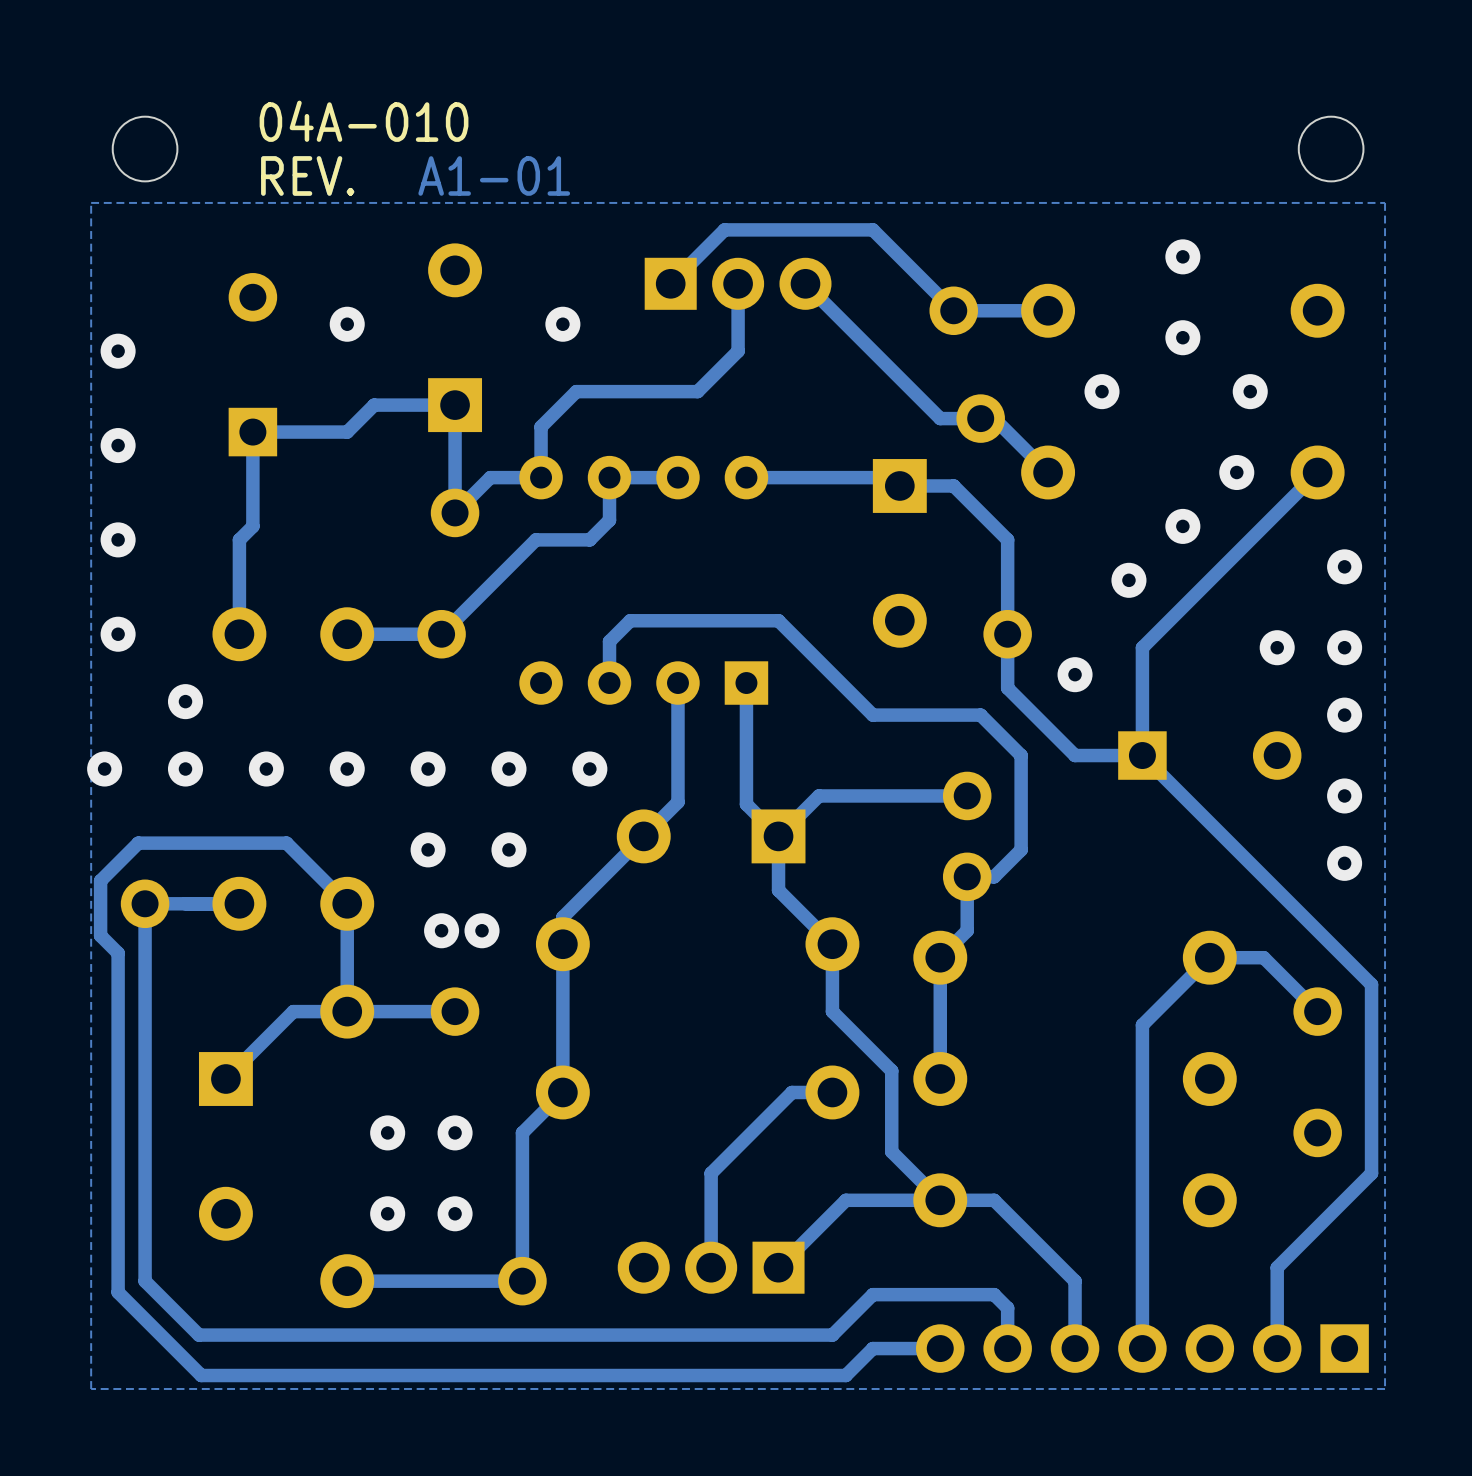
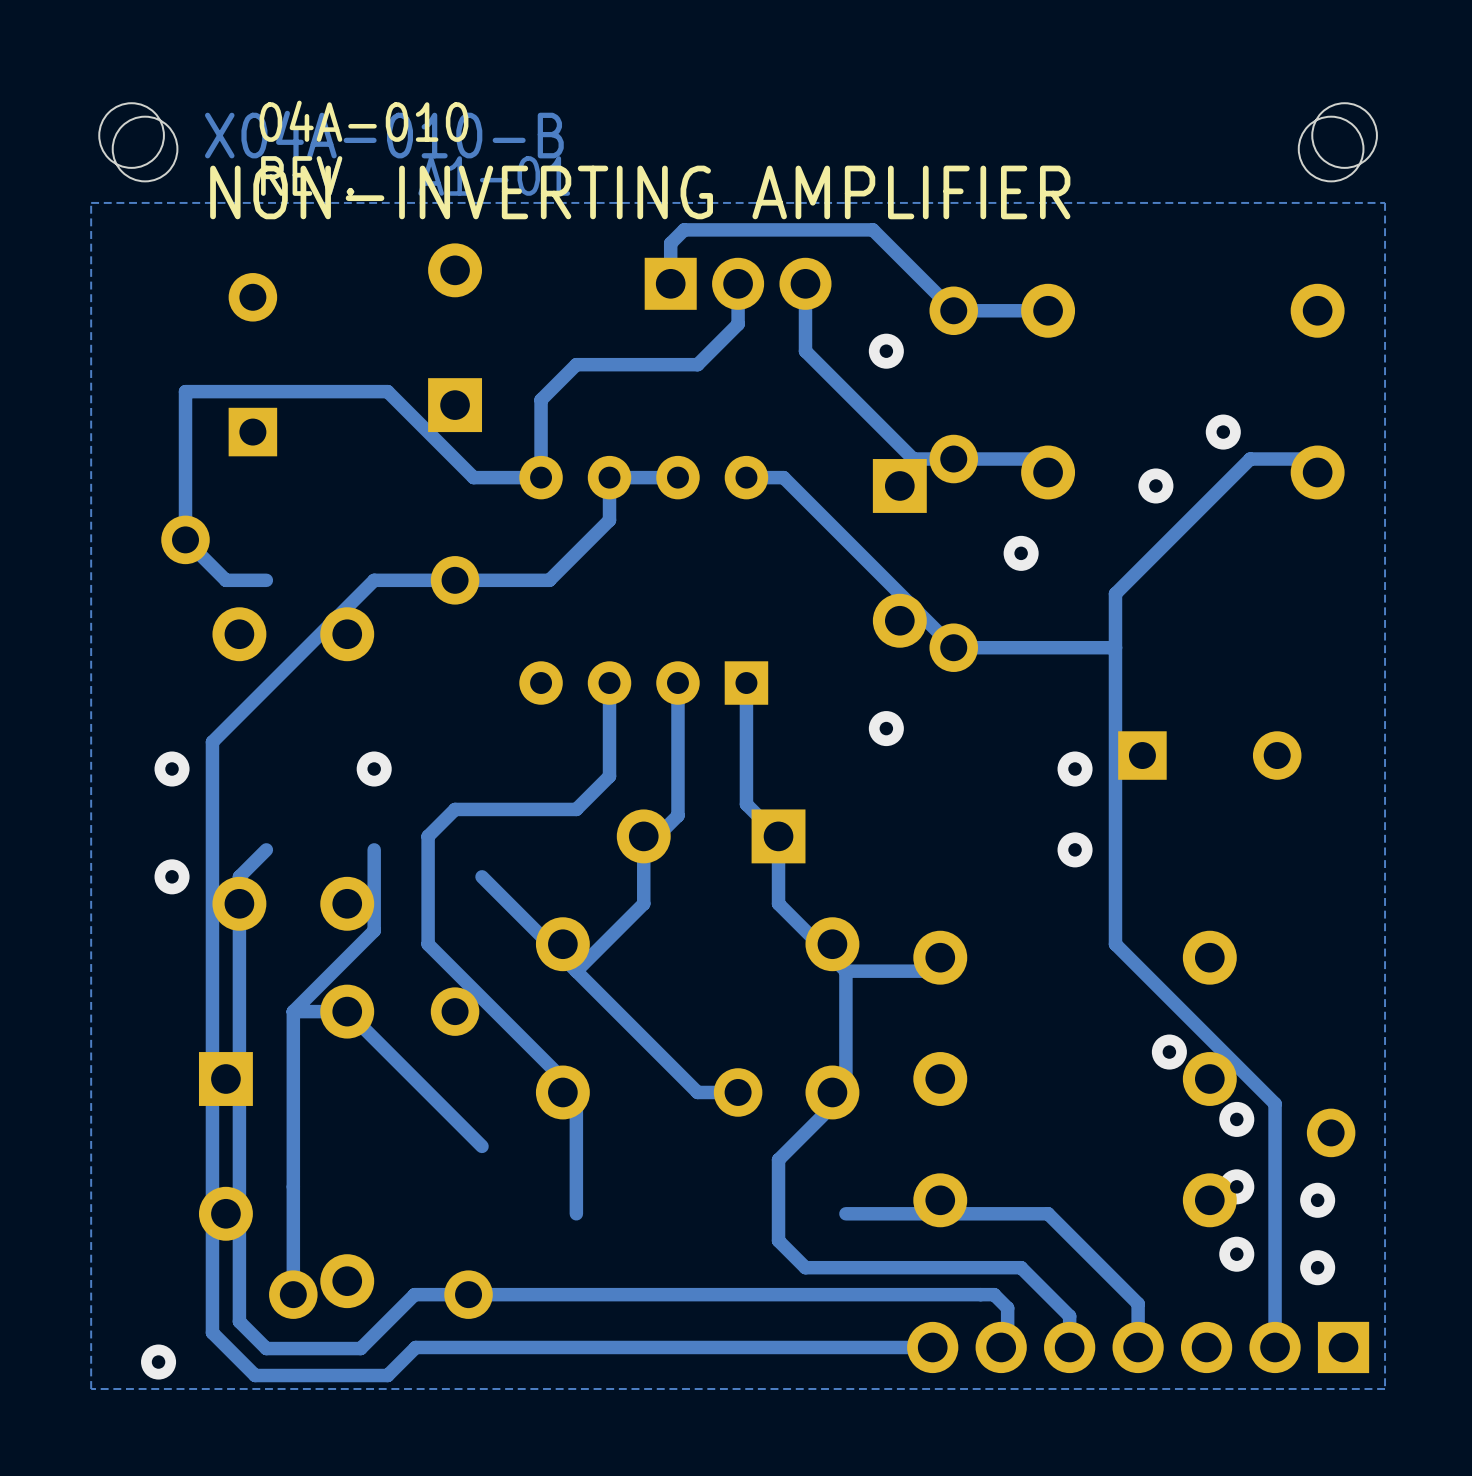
text: none -> NON-INVERTING AMPLIFIER (640, 192)
track: (724, 229) (670, 283) -> (724, 229) (684, 229) (670, 243) (670, 283)
via: (1182, 256) -> none
track: (805, 283) (940, 418) (994, 418) (1048, 472) -> (805, 283) (805, 351) (913, 459) (1048, 459)
via: (347, 324) -> none
via: (562, 324) -> none
track: (738, 324) (738, 351) (697, 391) (576, 391) (541, 426) -> (738, 324) (697, 364) (576, 364) (541, 399) (541, 426)
via: (1182, 337) -> none
via: (118, 351) -> none
via: none -> (886, 351)
via: (1102, 391) -> none
via: (1250, 391) -> none
part position: (980, 418) -> (953, 459)
via: none -> (1223, 432)
via: (118, 445) -> none
track: none -> (1317, 459) (1250, 459) (1115, 593) (1115, 944) (1275, 1103) (1275, 1347)
via: (1236, 472) -> none
track: (1317, 472) (1142, 647) (1142, 755) -> none
track: (490, 477) (455, 512) (455, 405) (374, 405) (347, 432) (252, 432) (252, 526) (239, 539) (239, 634) -> (490, 477) (473, 477) (387, 391) (185, 391) (185, 539) (225, 580) (266, 580)
track: (783, 477) (891, 477) (899, 485) (953, 485) (1007, 539) (1007, 688) (1075, 755) (1142, 755) -> (783, 477) (953, 647) (1115, 647)
via: none -> (1155, 485)
part: (455, 512) -> none
via: (1182, 526) -> none
via: (118, 539) -> none
part: none -> (185, 539)
track: (589, 539) (535, 539) (441, 634) (347, 634) -> none
via: none -> (1021, 553)
via: (1344, 566) -> none
part: none -> (455, 580)
via: (1128, 580) -> none
via: (118, 634) -> none
part: (441, 634) -> none
part position: (1007, 634) -> (953, 647)
via: (1277, 647) -> none
via: (1344, 647) -> none
via: (1075, 674) -> none
track: (609, 683) (609, 641) (630, 620) (778, 620) (872, 715) (980, 715) (1021, 755) (1021, 849) (994, 876) (967, 876) (967, 930) (940, 957) (940, 1079) -> (609, 683) (609, 776) (576, 809) (455, 809) (428, 836) (428, 944) (576, 1092) (576, 1213)
via: (185, 701) -> none
via: (1344, 715) -> none
via: none -> (886, 728)
part: none -> (738, 738)
track: (1142, 755) (1371, 984) (1371, 1173) (1277, 1267) (1277, 1348) -> none
via: (104, 769) -> none
via position: (185, 769) -> (172, 769)
via: (266, 769) -> none
via position: (347, 769) -> (374, 769)
via: (428, 769) -> none
via: (508, 769) -> none
via: (589, 769) -> none
via: none -> (1075, 769)
track: (967, 795) (818, 795) (778, 836) (778, 849) -> none
part: (967, 795) -> none
via: (1344, 795) -> none
track: (677, 802) (562, 917) (562, 1092) (522, 1132) (522, 1281) (347, 1281) -> (677, 802) (677, 815) (643, 849) (643, 903) (576, 971)
track: none -> (374, 849) (374, 930) (293, 1011) (293, 1294)
via: (428, 849) -> none
via: (508, 849) -> none
via: none -> (1075, 849)
via: (1344, 863) -> none
via: none -> (172, 876)
track: none -> (482, 876) (697, 1092) (738, 1092)
part: (967, 876) -> none
track: (778, 890) (832, 944) (832, 1011) (891, 1070) (891, 1151) (940, 1200) -> (778, 890) (778, 903) (845, 971)
part: (145, 903) -> none
track: (239, 903) (145, 903) (145, 1281) (198, 1335) (832, 1335) (872, 1294) -> (266, 849) (239, 876) (239, 1321) (266, 1348) (360, 1348) (414, 1294) (872, 1294)
via: (441, 930) -> none
via: (482, 930) -> none
track: none -> (845, 971) (845, 1092) (778, 1159) (778, 1240) (805, 1267) (1021, 1267) (1069, 1316) (1069, 1347)
track: none -> (940, 971) (845, 971)
track: (293, 1011) (225, 1079) -> none
track: none -> (347, 1011) (482, 1146)
track: (455, 1011) (347, 1011) (347, 903) (286, 843) (138, 843) (100, 880) (100, 935) (118, 953) (118, 1292) (201, 1375) (255, 1375) -> (589, 539) (549, 580) (374, 580) (212, 742) (212, 1332) (255, 1375)
track: (1317, 1011) (1263, 957) (1209, 957) (1142, 1025) (1142, 1348) -> none
part: (1317, 1011) -> none
via: none -> (1169, 1052)
part: none -> (738, 1092)
track: (832, 1092) (792, 1092) (711, 1173) (711, 1267) -> none
via: none -> (1236, 1119)
via: (387, 1132) -> none
via: (455, 1132) -> none
part position: (1317, 1132) -> (1331, 1132)
via: none -> (1236, 1186)
via: none -> (1317, 1200)
via: (387, 1213) -> none
via: (455, 1213) -> none
track: none -> (845, 1213) (1048, 1213) (1138, 1303) (1138, 1347)
via: none -> (1236, 1254)
part: (711, 1267) -> none
track: (778, 1267) (845, 1200) (994, 1200) (1075, 1281) (1075, 1348) -> none
via: none -> (1317, 1267)
part position: (522, 1281) -> (468, 1294)
part: none -> (293, 1294)
track: (940, 1348) (872, 1348) (845, 1375) (387, 1375) -> (932, 1347) (415, 1347) (387, 1375)
part: (1142, 1348) -> none
via: none -> (158, 1362)

